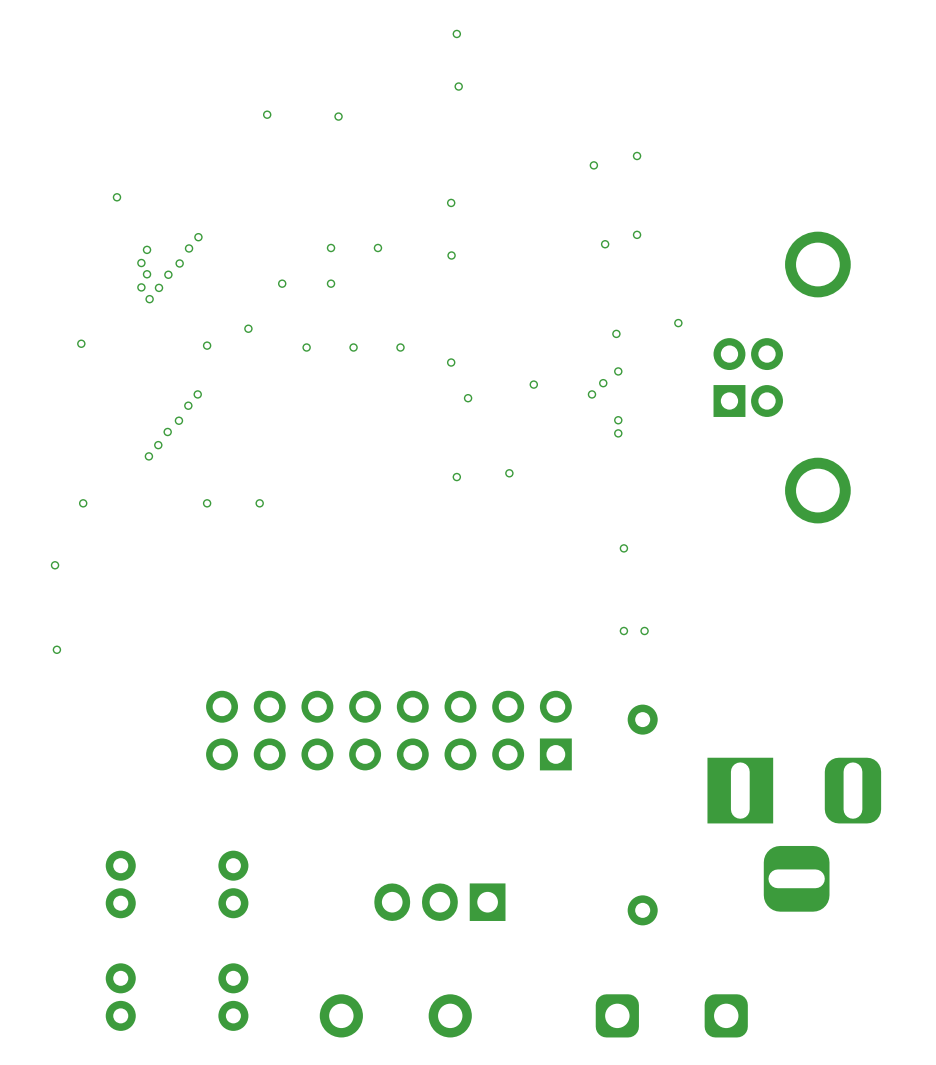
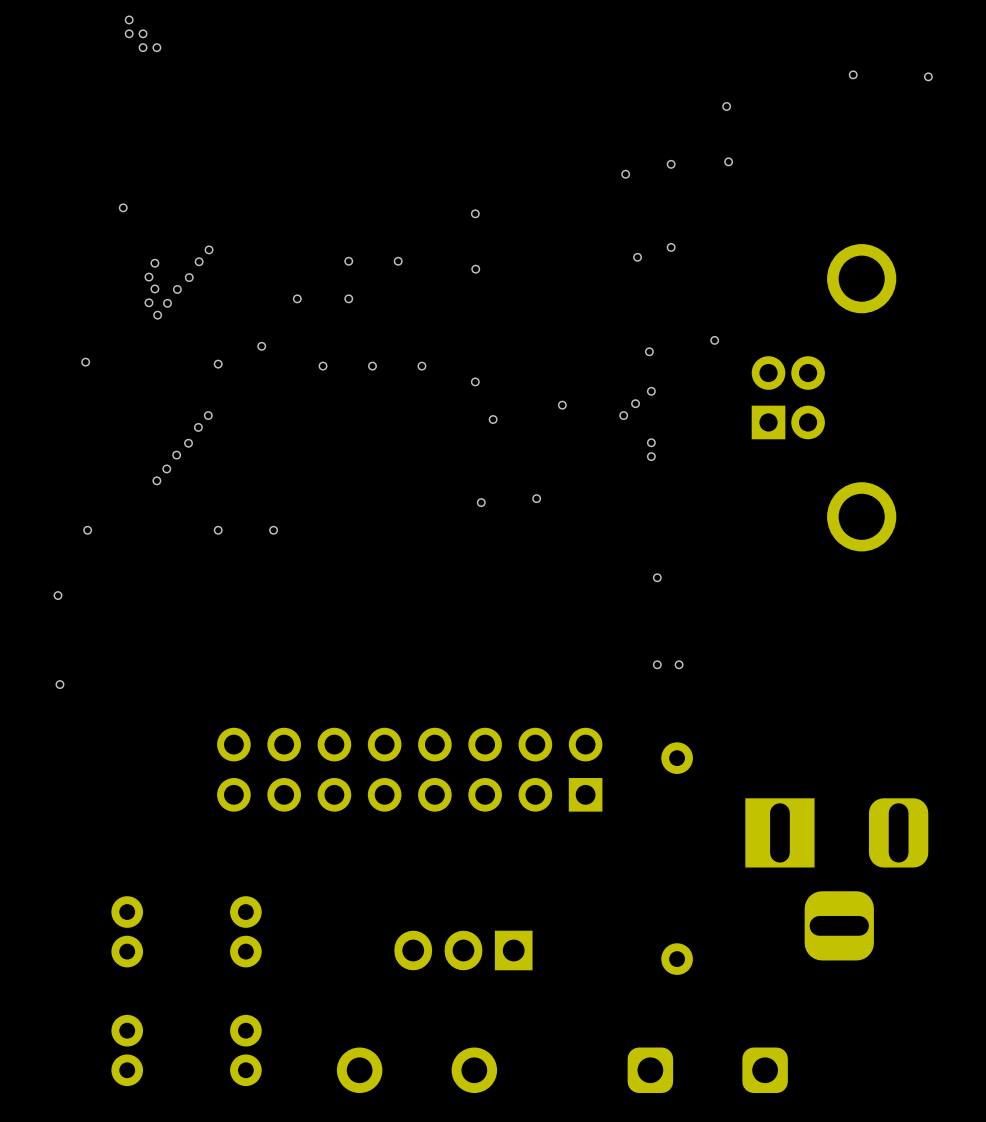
via: none -> (129, 19)
via: none -> (129, 33)
via: none -> (143, 33)
via: (456, 33) -> none
via: none -> (143, 47)
via: none -> (156, 47)
via: none -> (853, 74)
via: none -> (928, 76)
via: (458, 86) -> none
via: none -> (726, 106)
via: (267, 114) -> none
via: (338, 116) -> none
via: none -> (728, 161)

